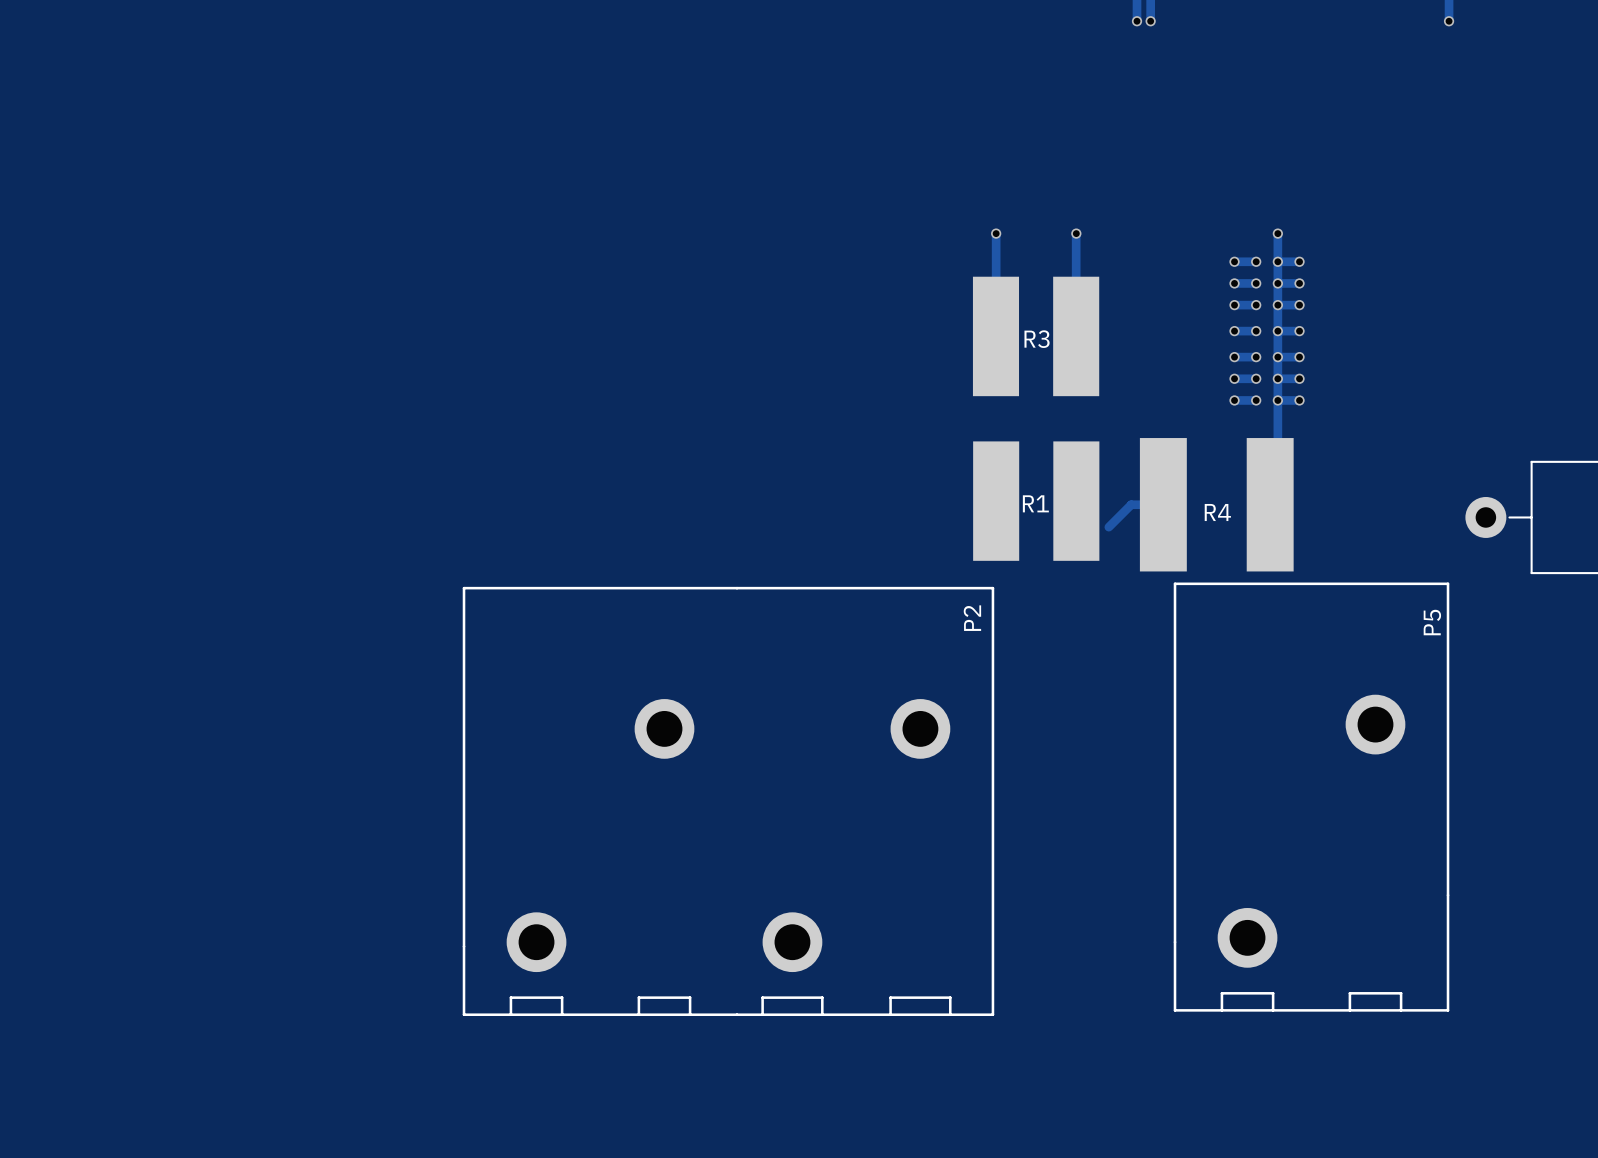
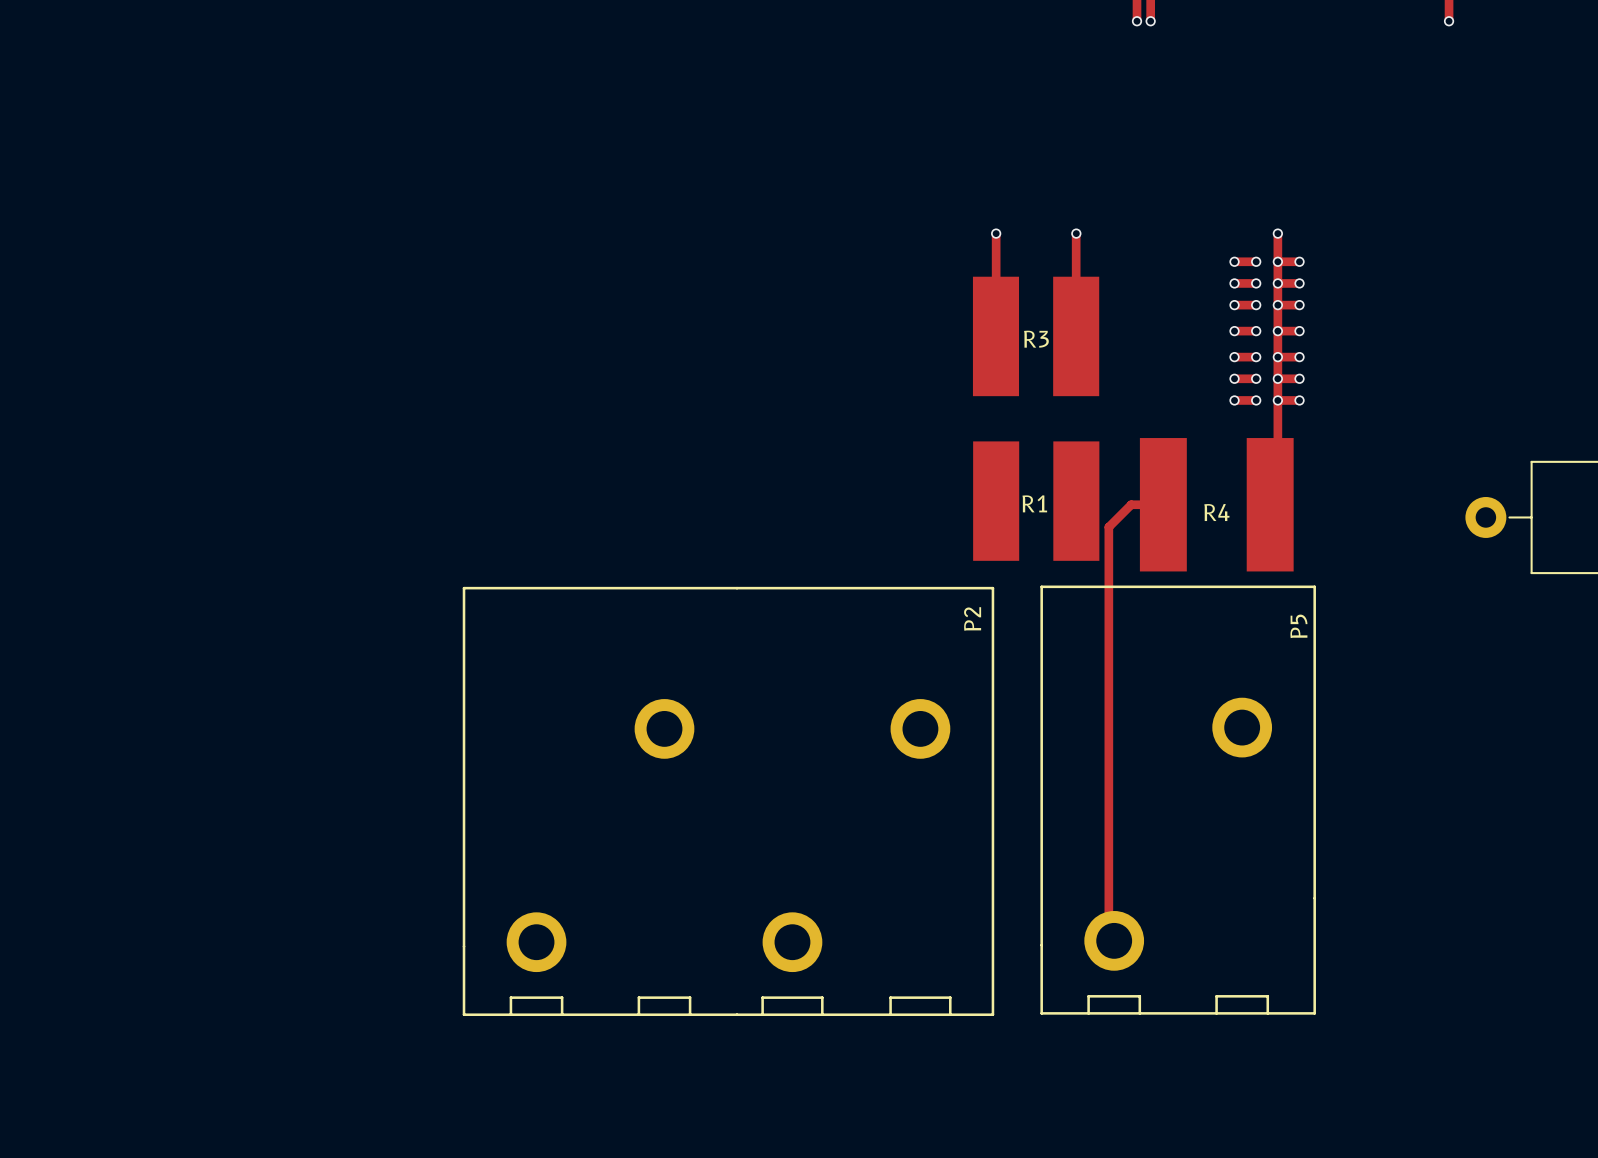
track: none -> (1108, 527) (1108, 942)
P5 position: (1311, 797) -> (1178, 800)

